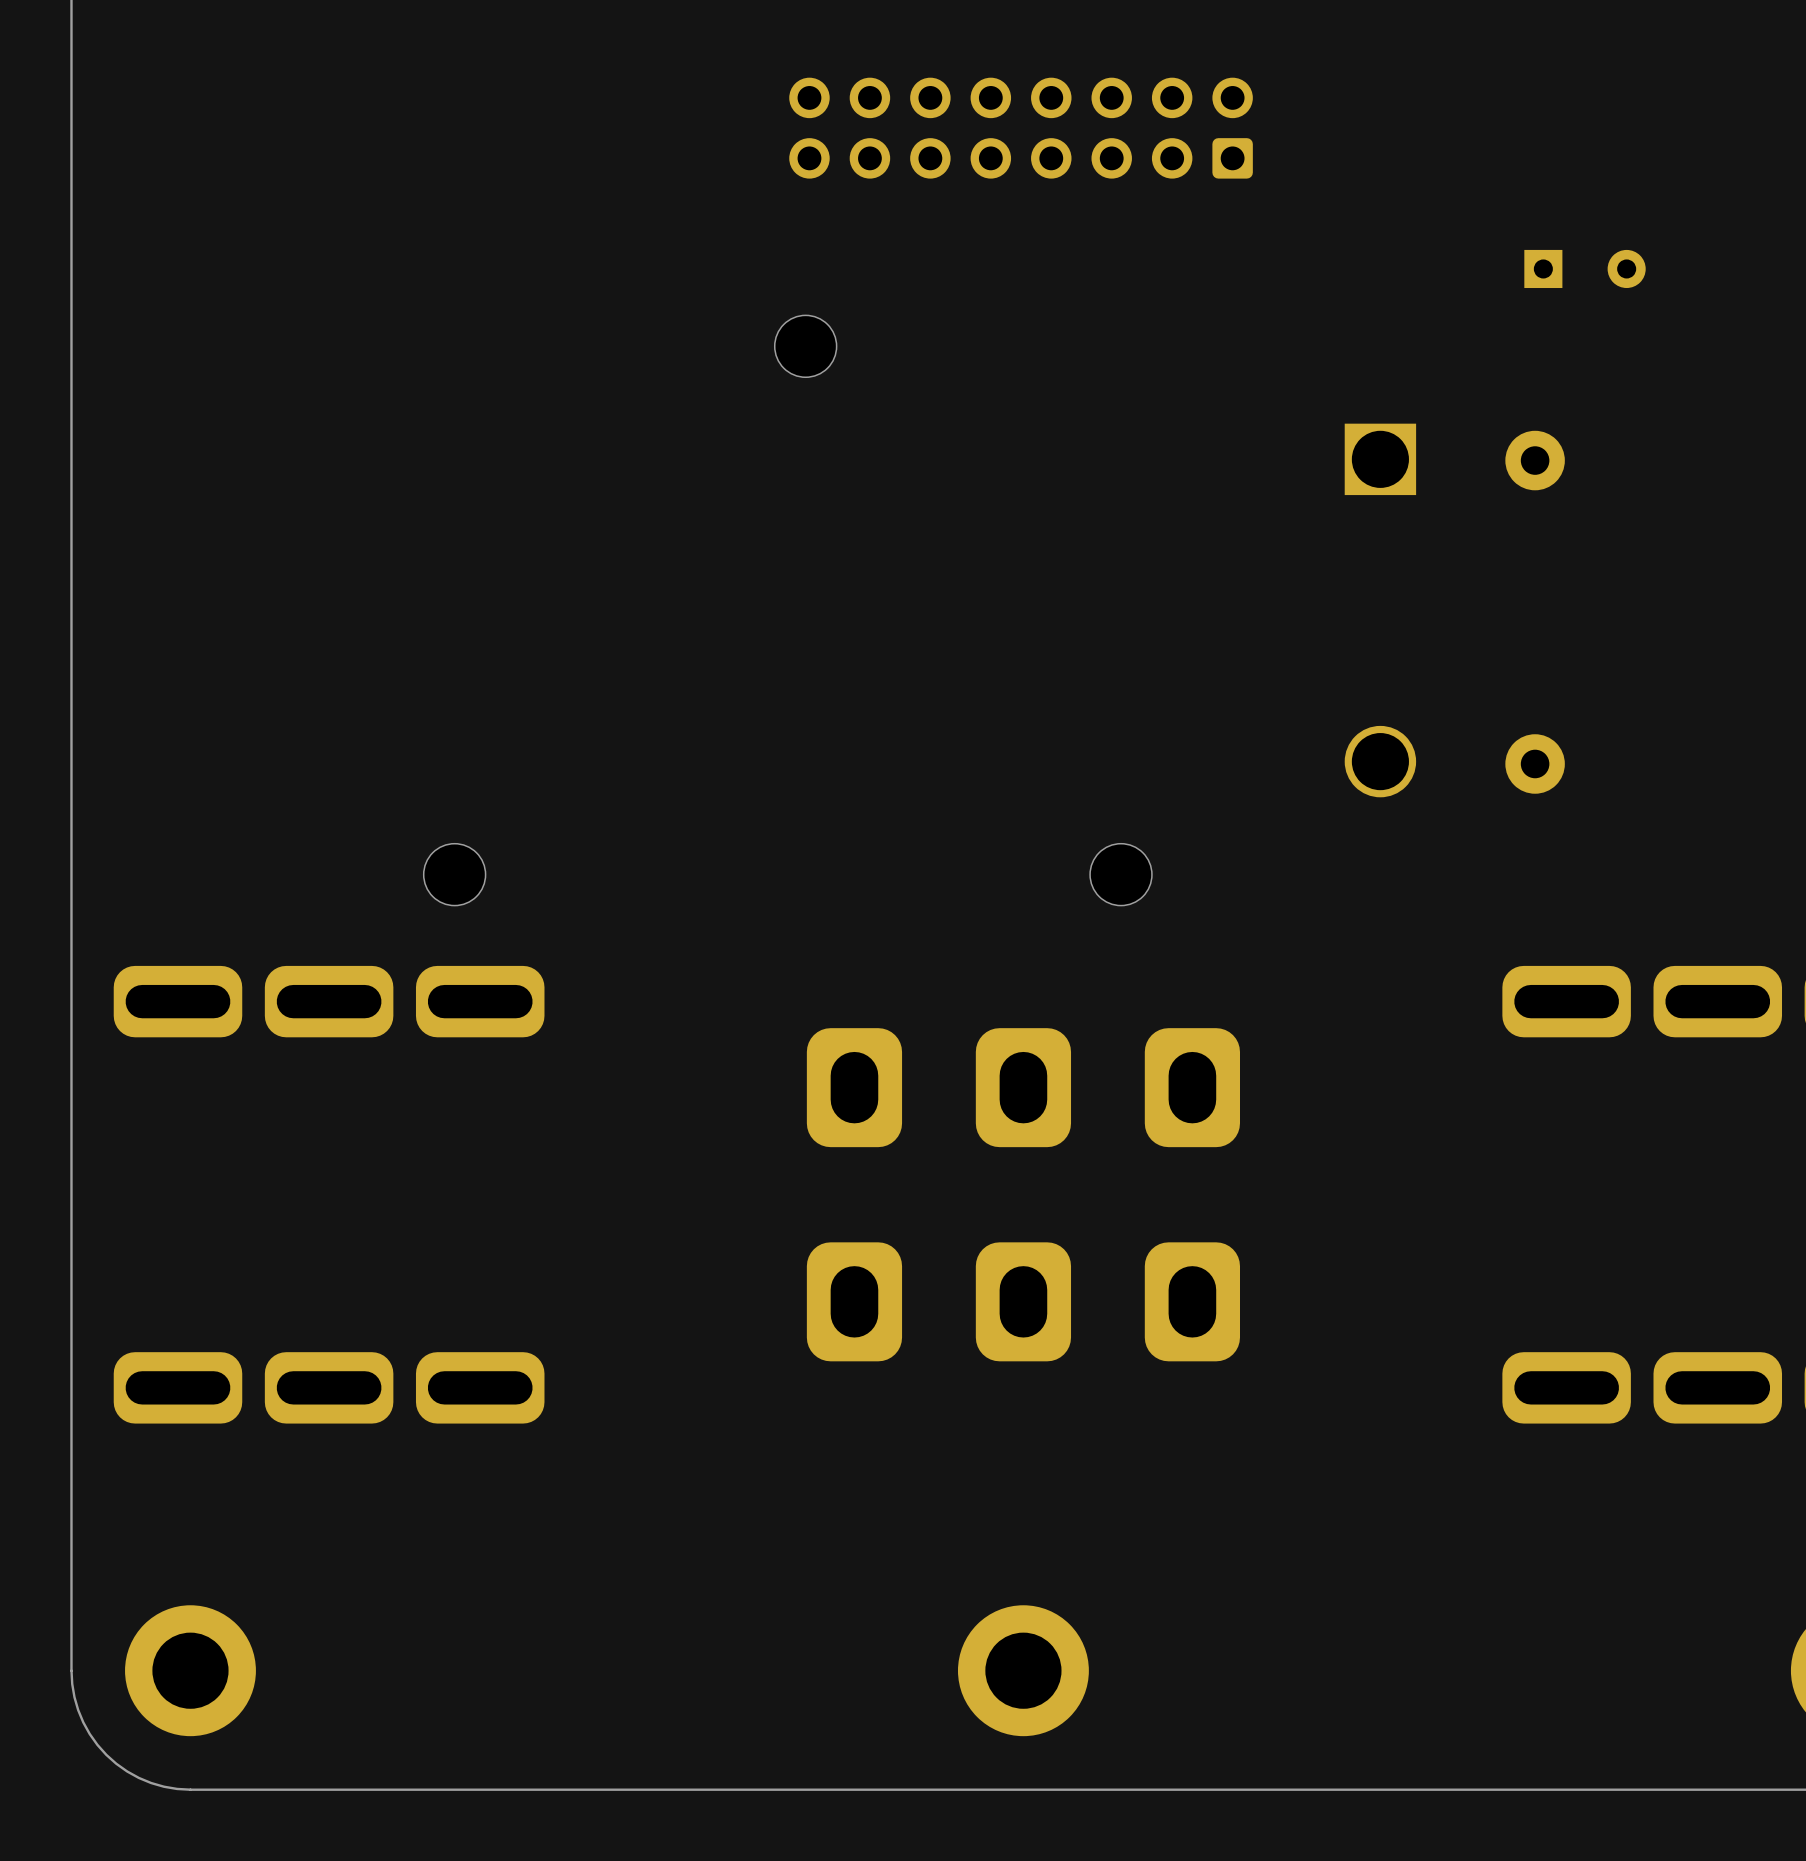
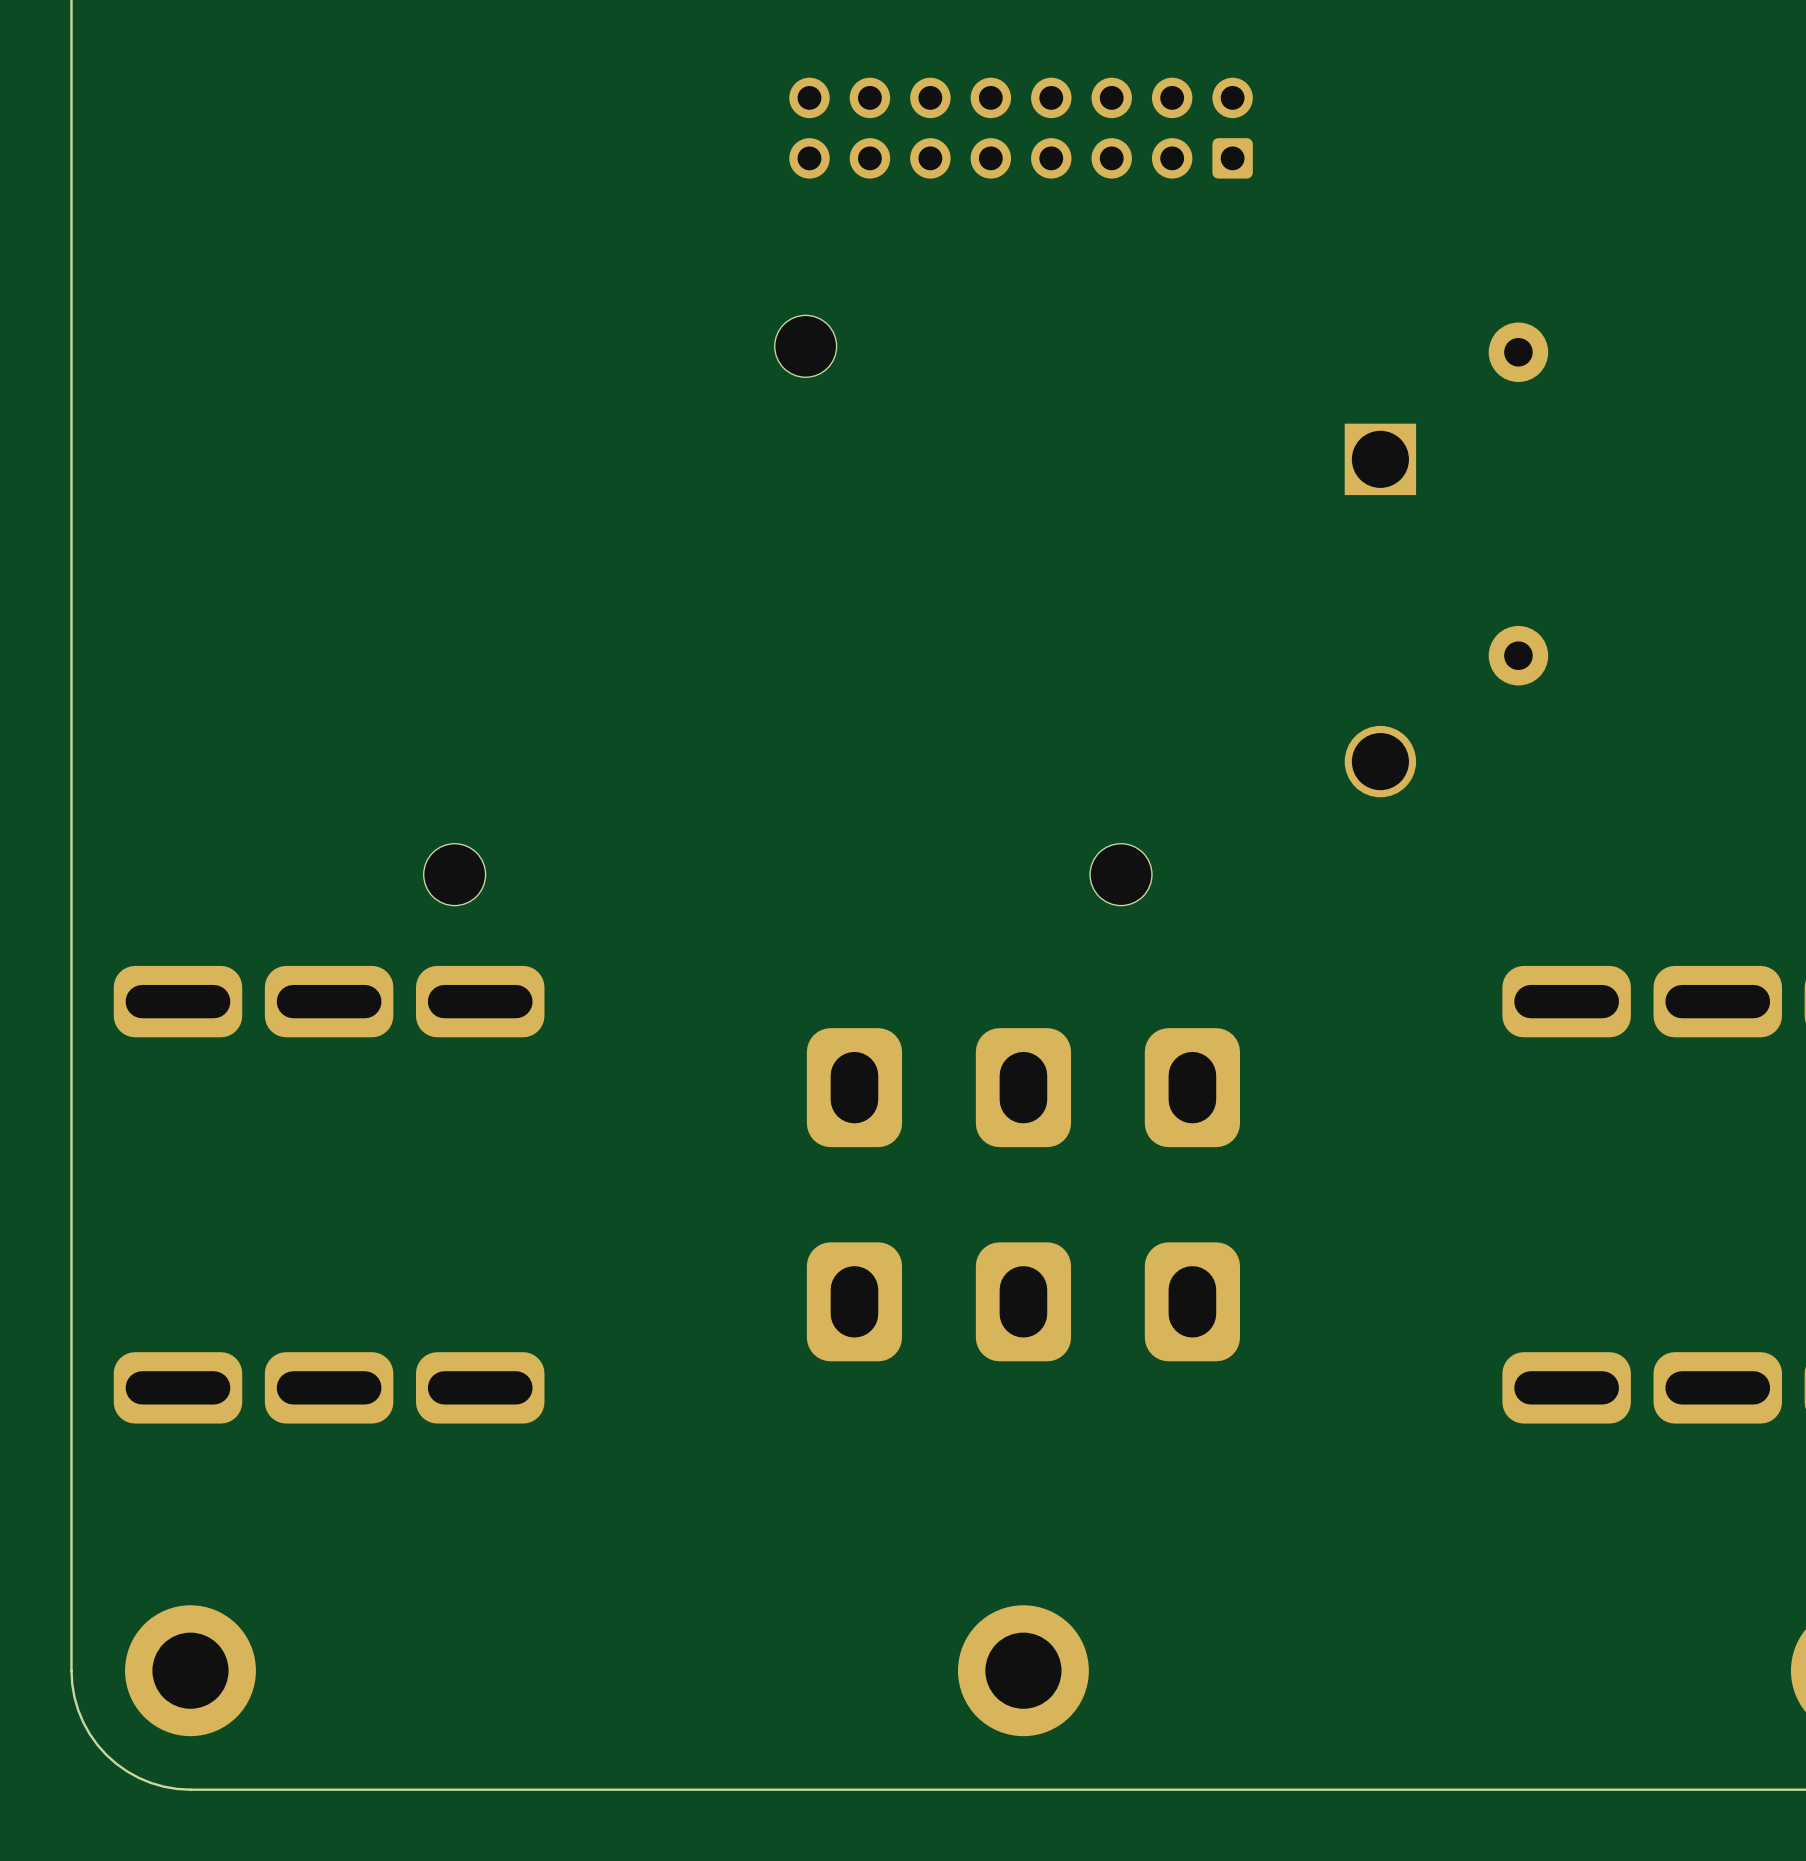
part: (1585, 268) -> none
part: none -> (1518, 352)
part: (1535, 460) -> none
part: none -> (1518, 655)
part: (1535, 763) -> none

